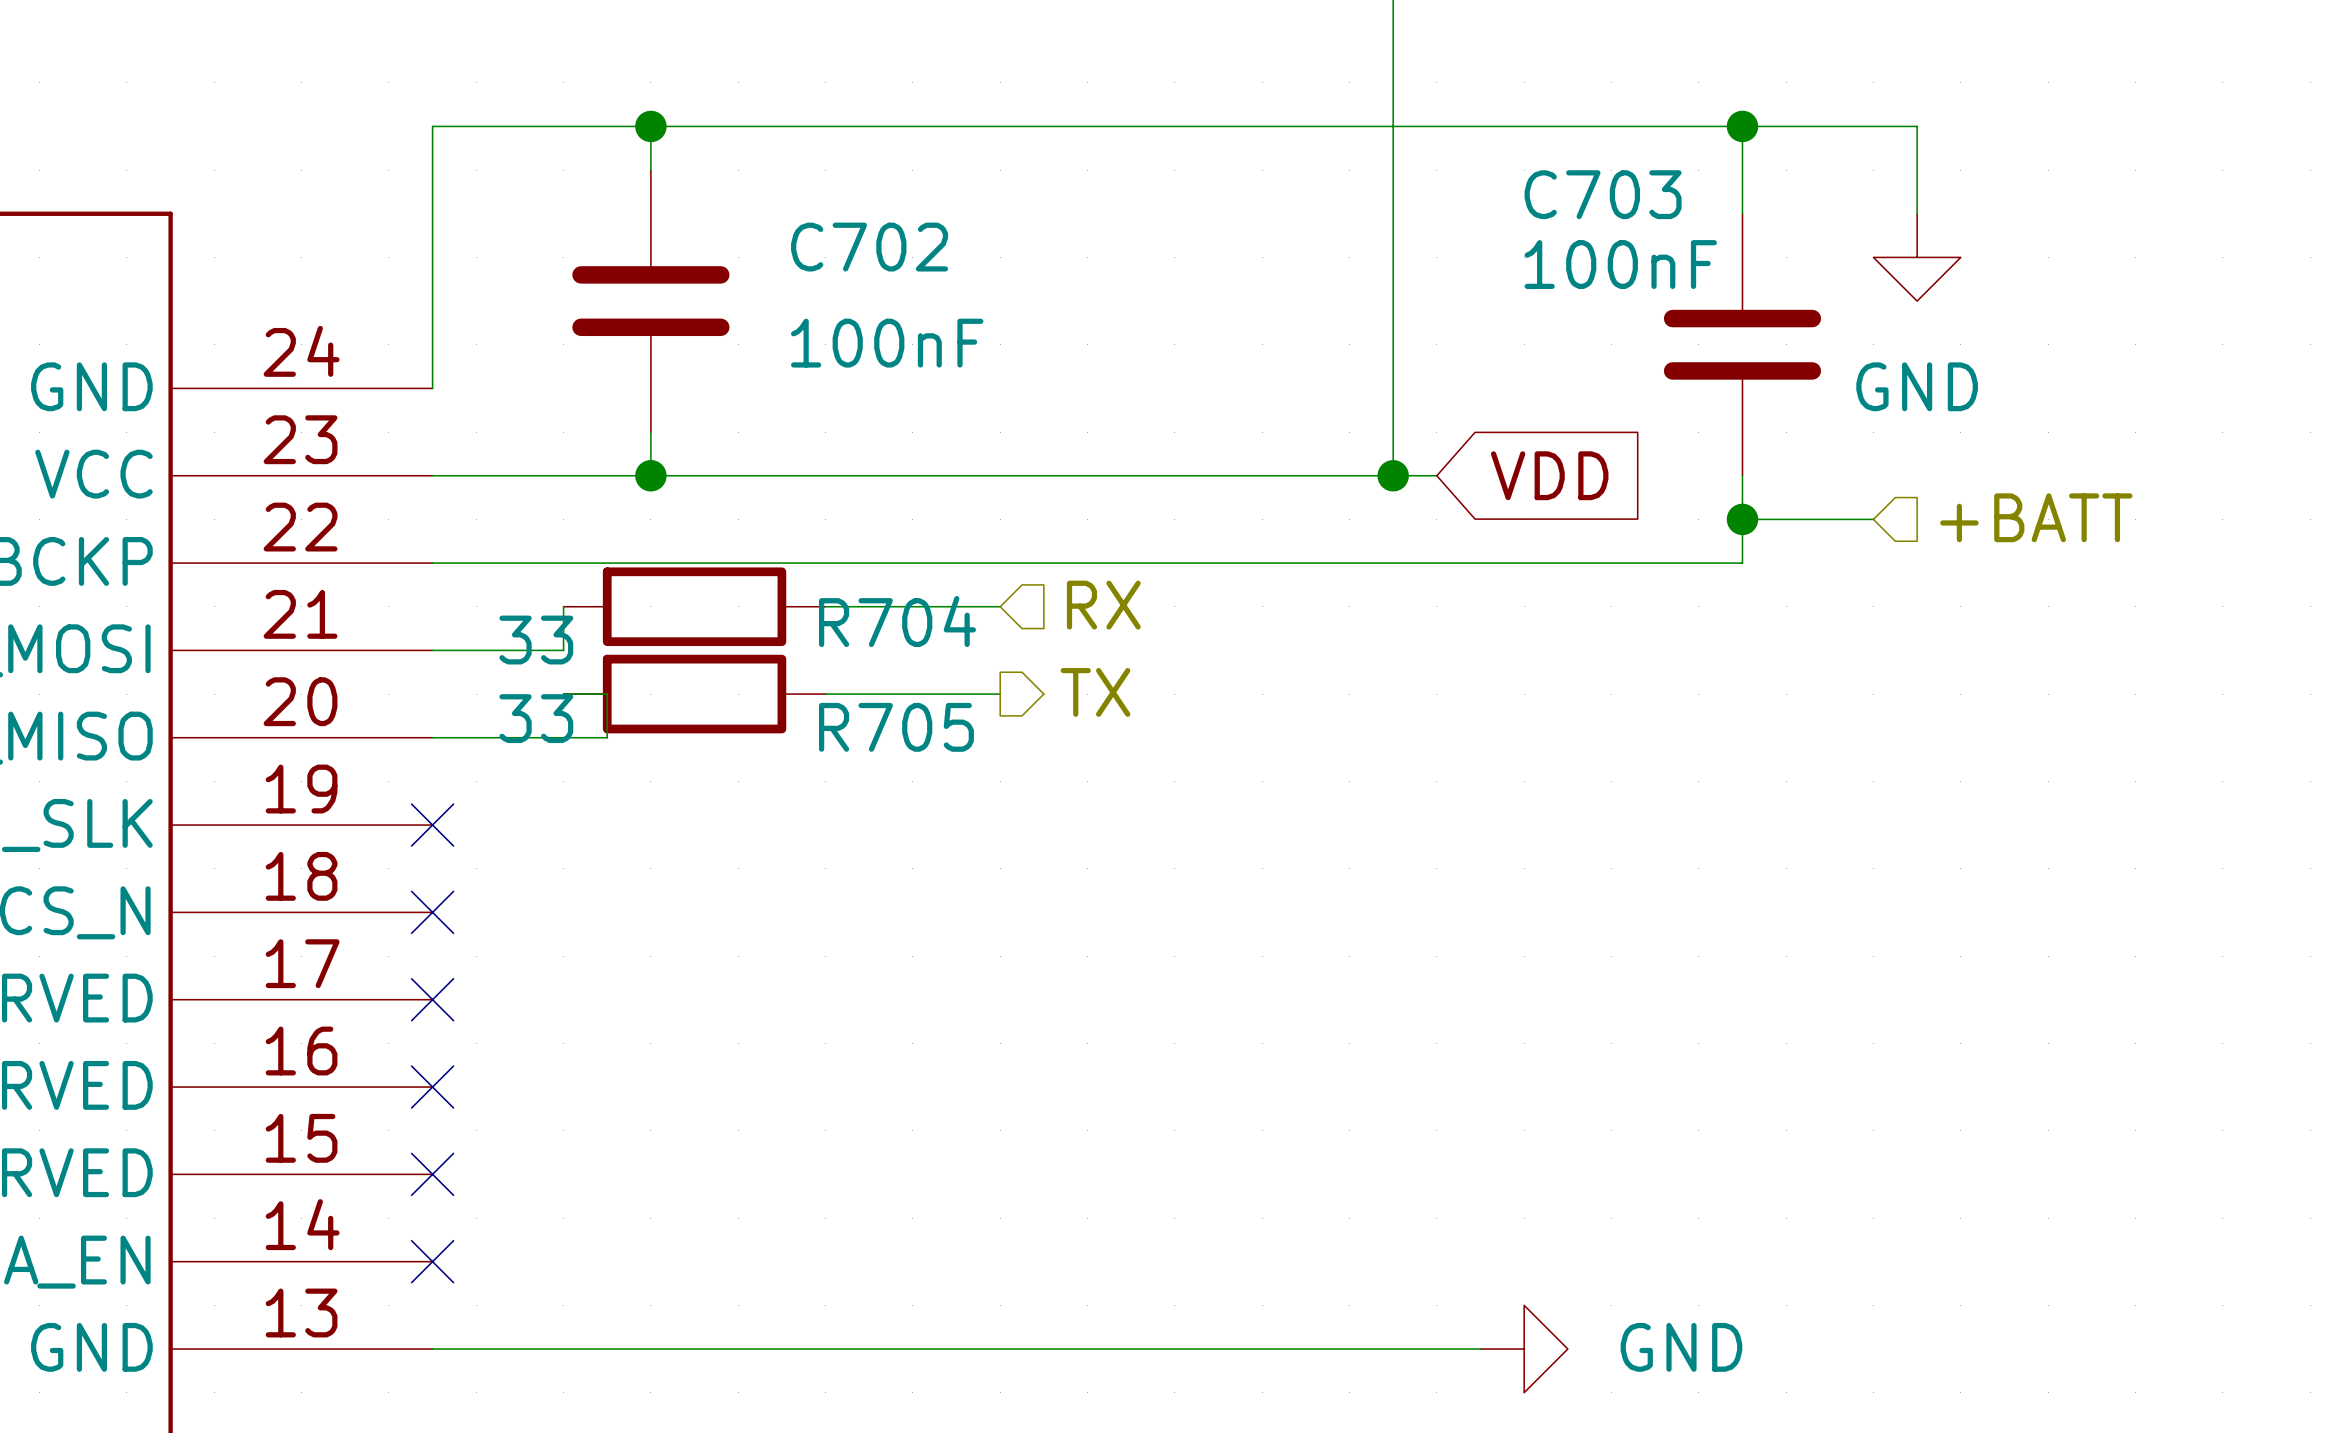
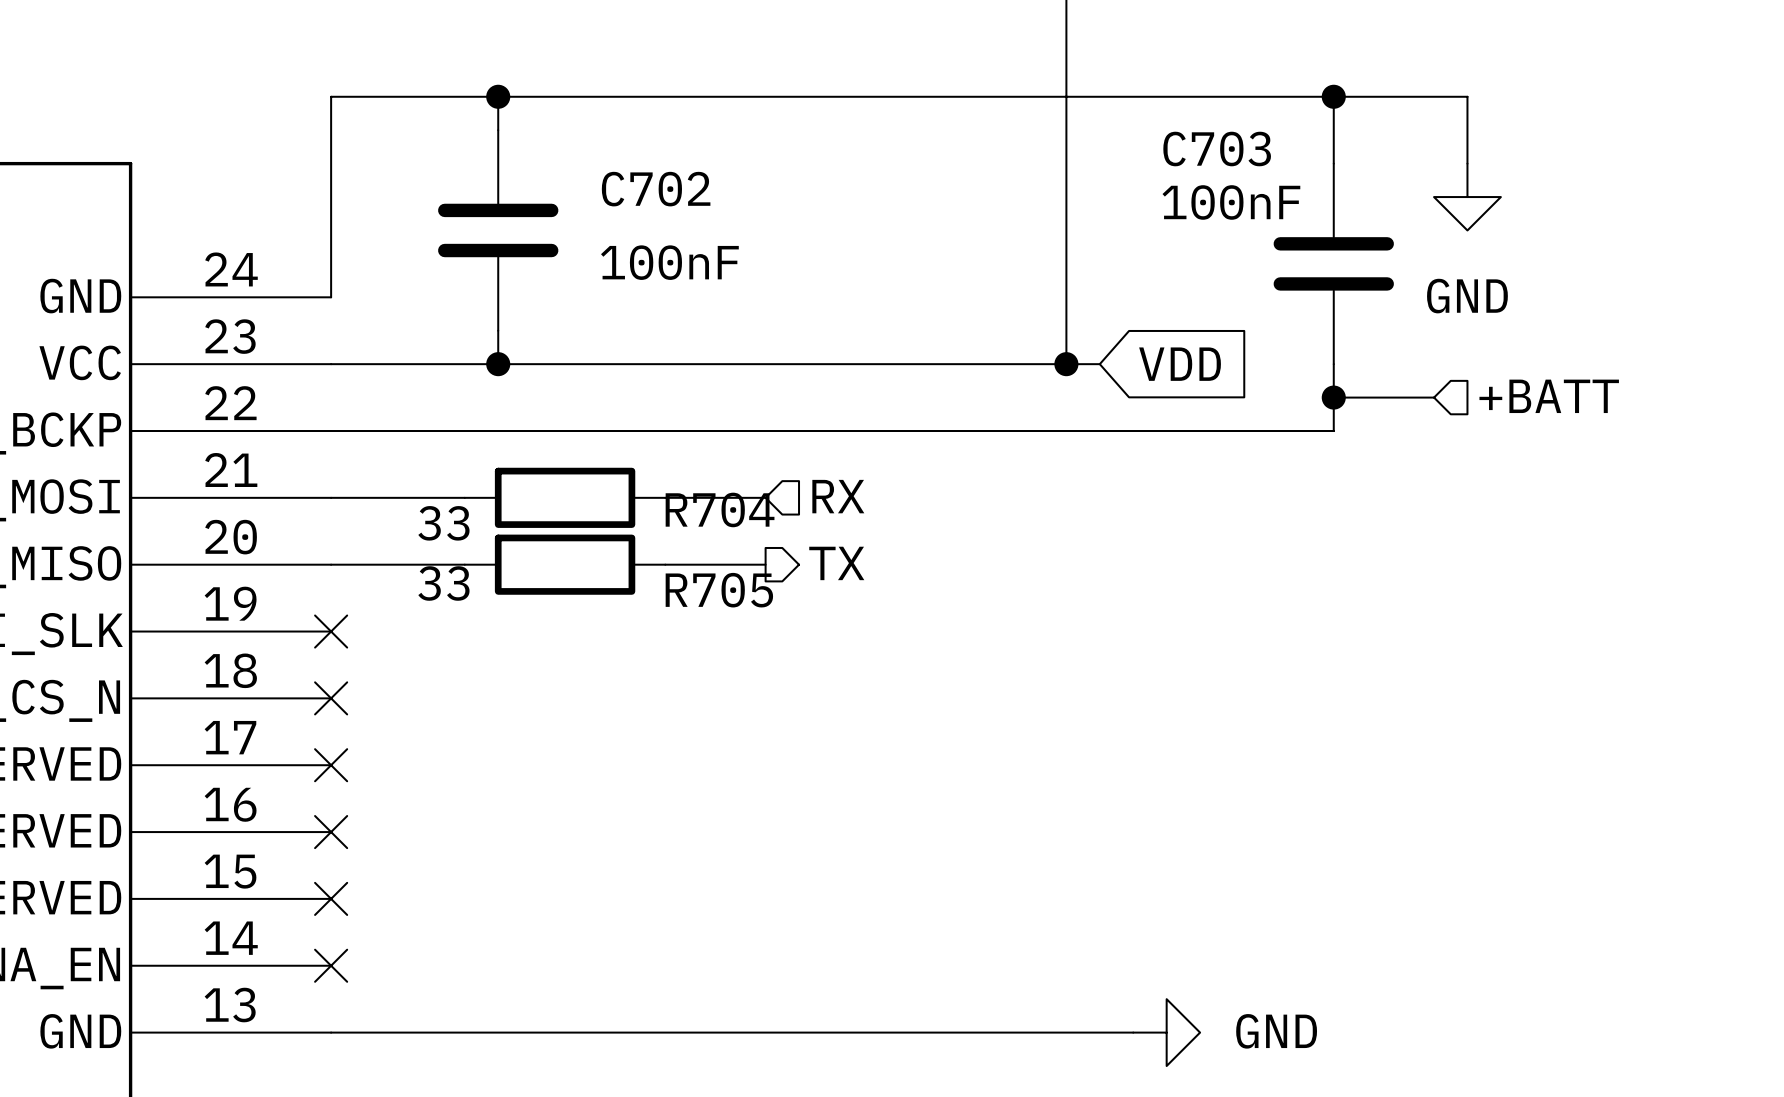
hierarchical label position: RX (1103, 605) -> RX (838, 496)
wire: (563, 606) (563, 650) -> (464, 497) (431, 497)
R704 position: (694, 606) -> (565, 497)
wire: (825, 606) (1000, 606) -> none
wire: none -> (665, 497) (765, 497)
hierarchical label position: TX (1095, 692) -> TX (836, 563)
wire: (563, 694) (607, 694) (607, 737) -> none
R705 position: (694, 694) -> (565, 564)
wire: (825, 694) (1000, 694) -> none
wire: none -> (665, 564) (765, 564)

